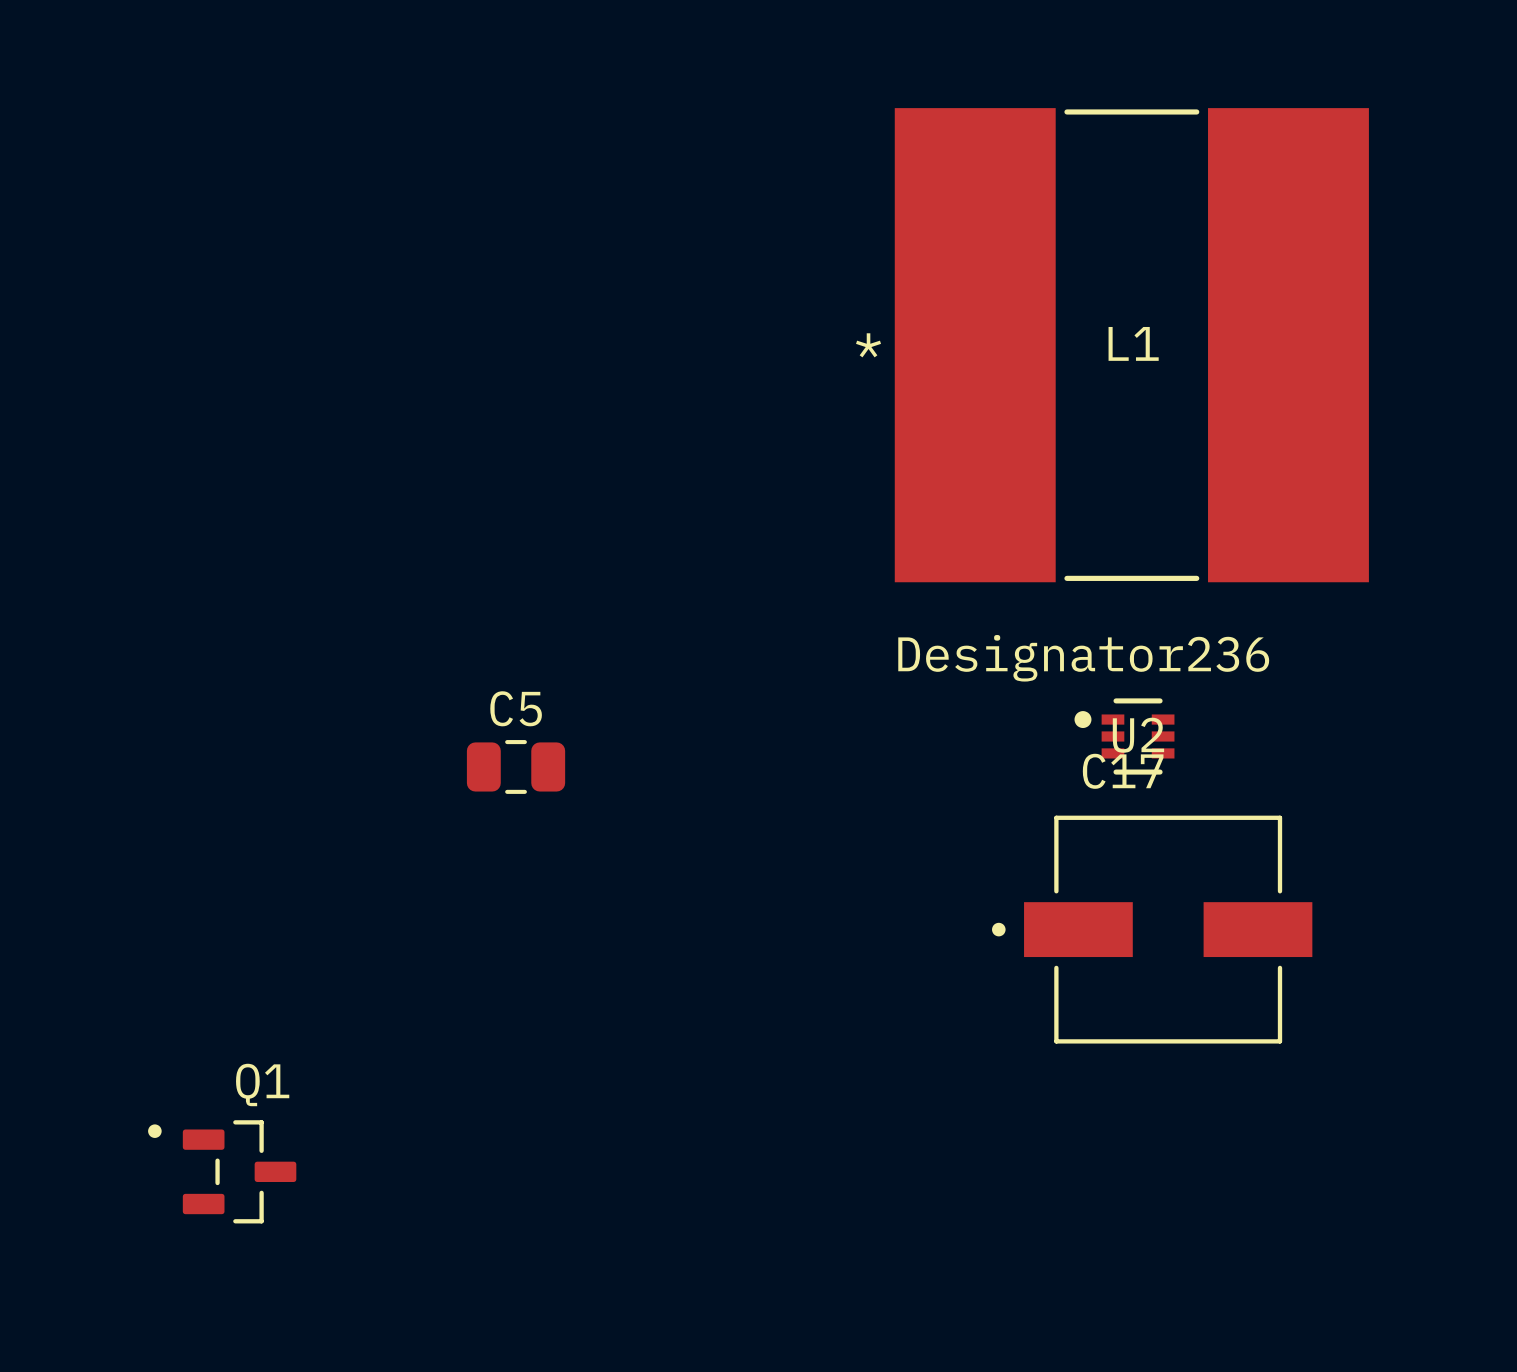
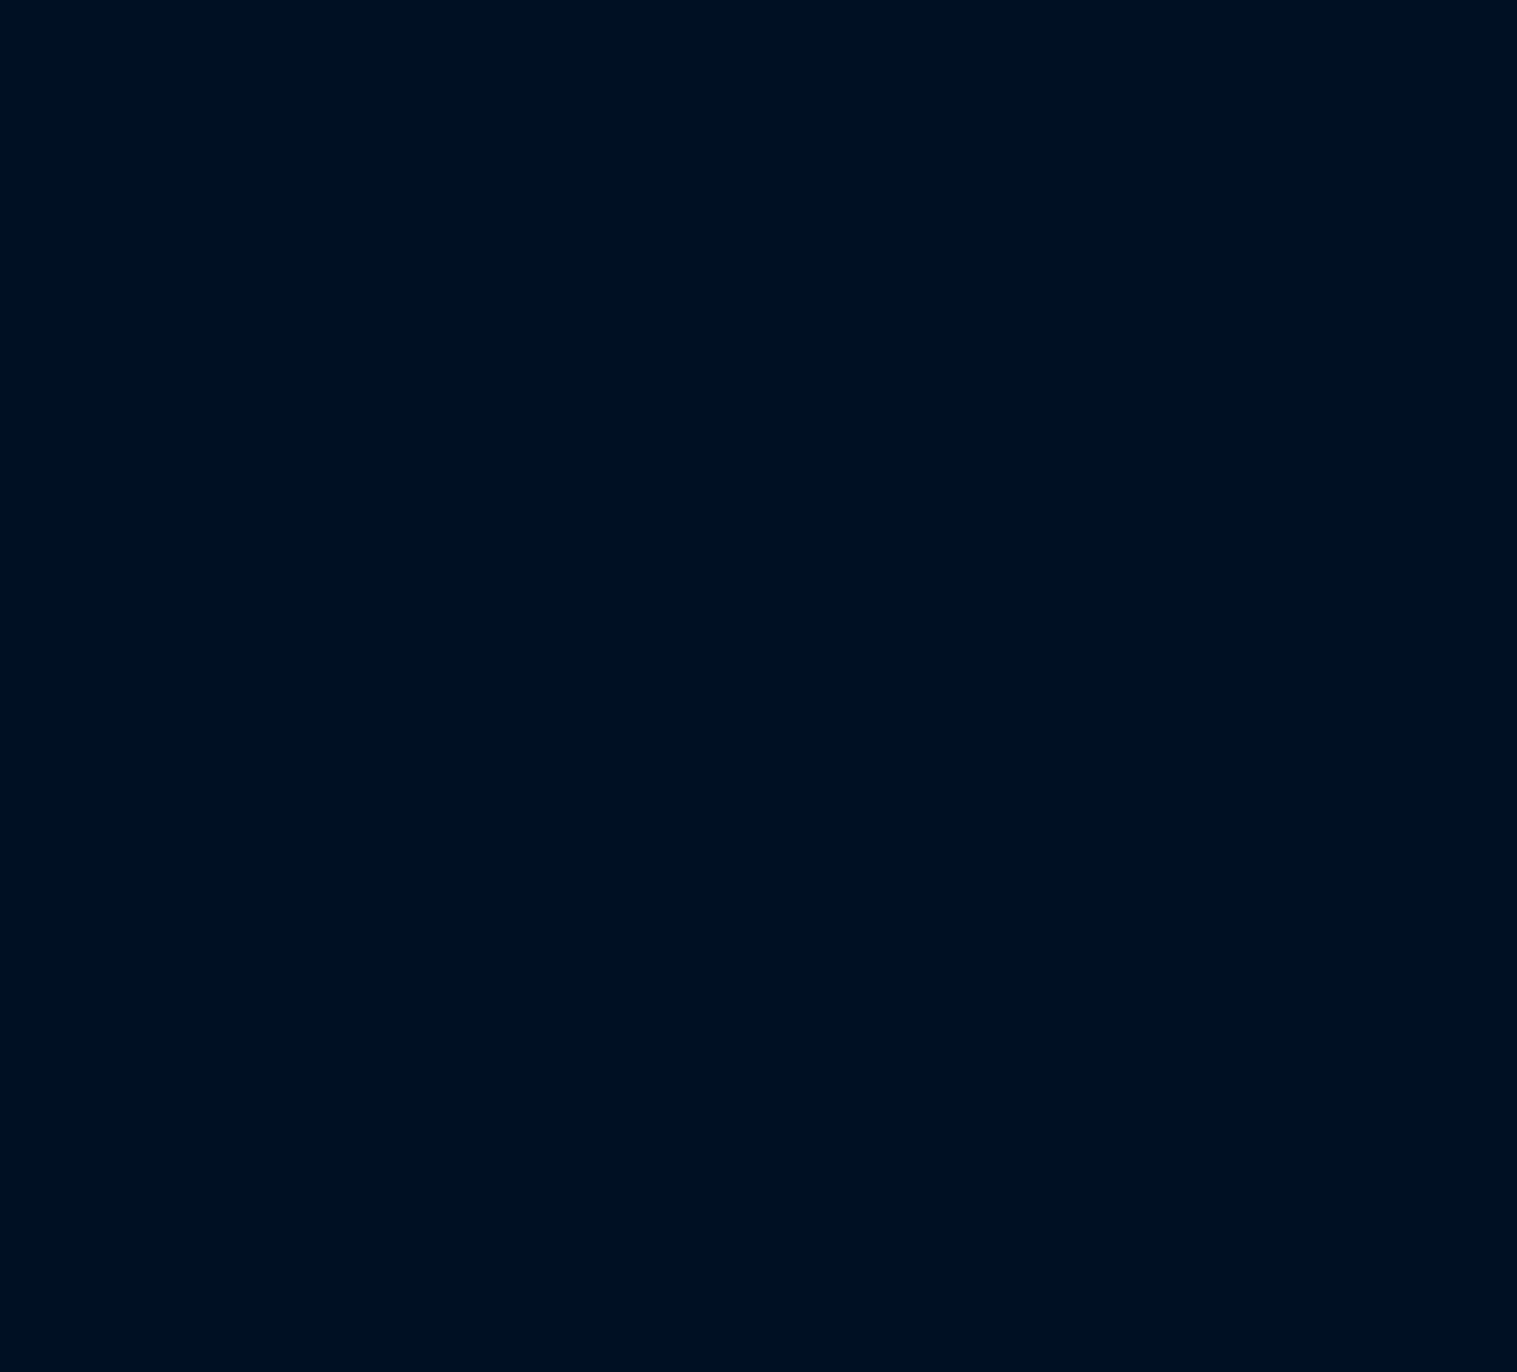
L1: (1131, 345) -> none
U2: (1124, 736) -> none
C5: (516, 766) -> none
C17: (1152, 929) -> none
Q1: (222, 1171) -> none

